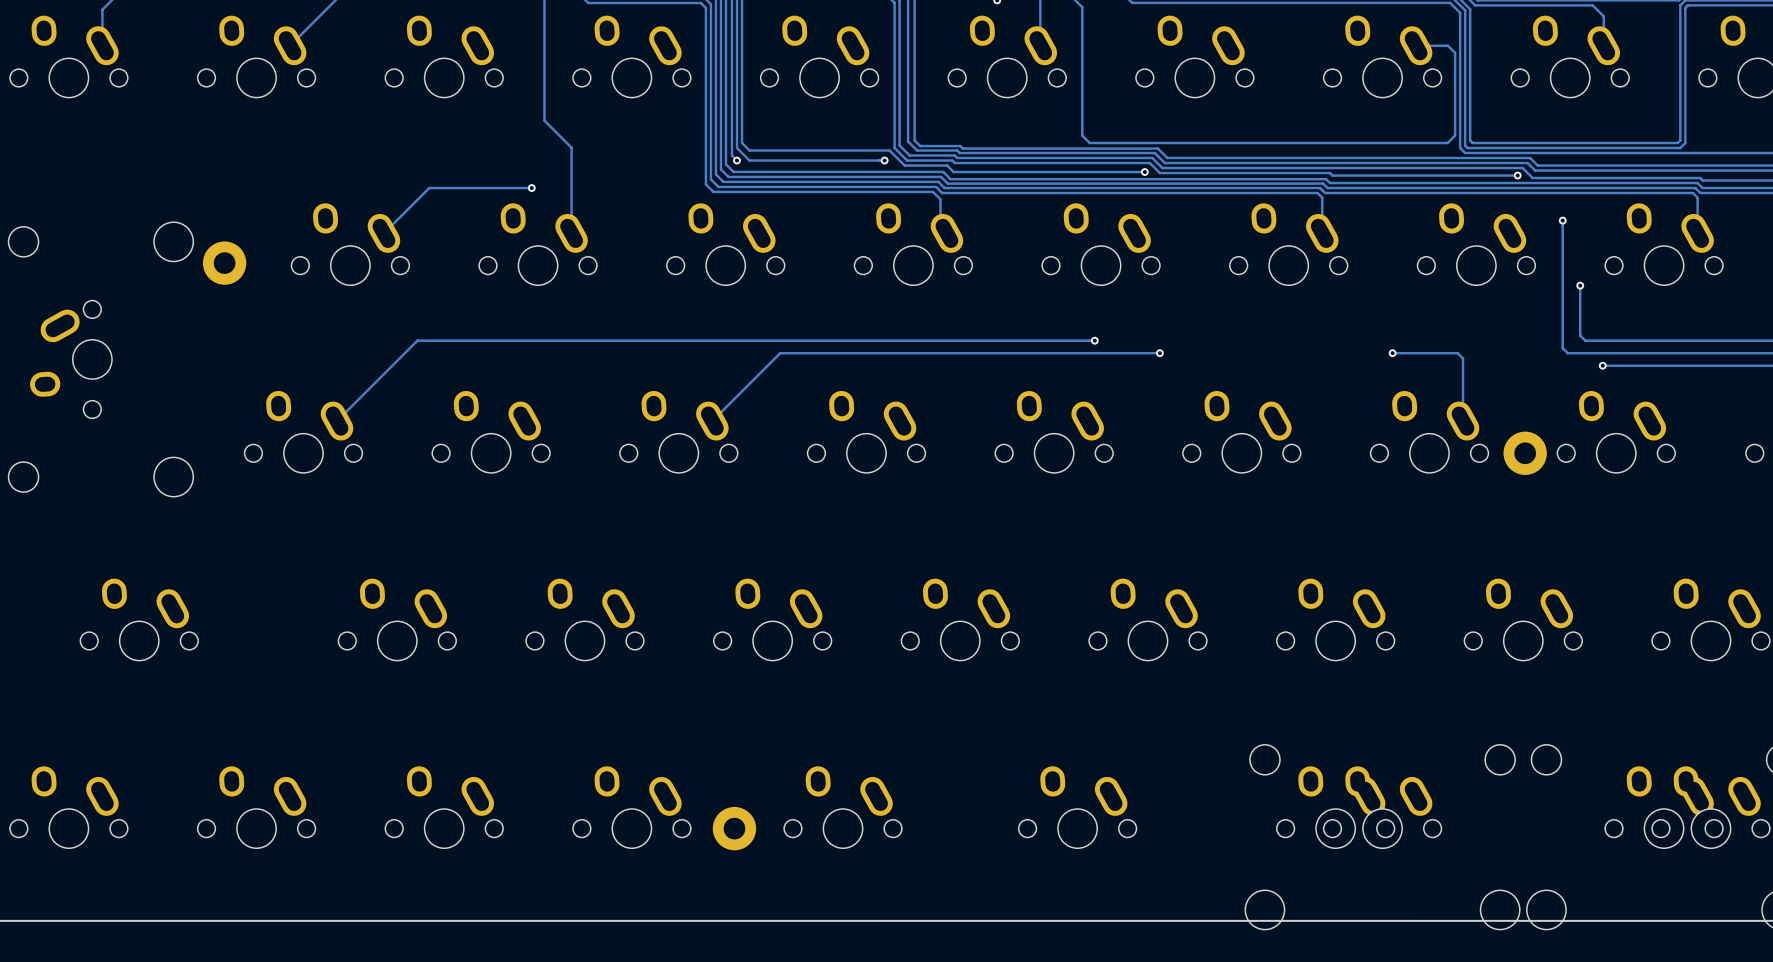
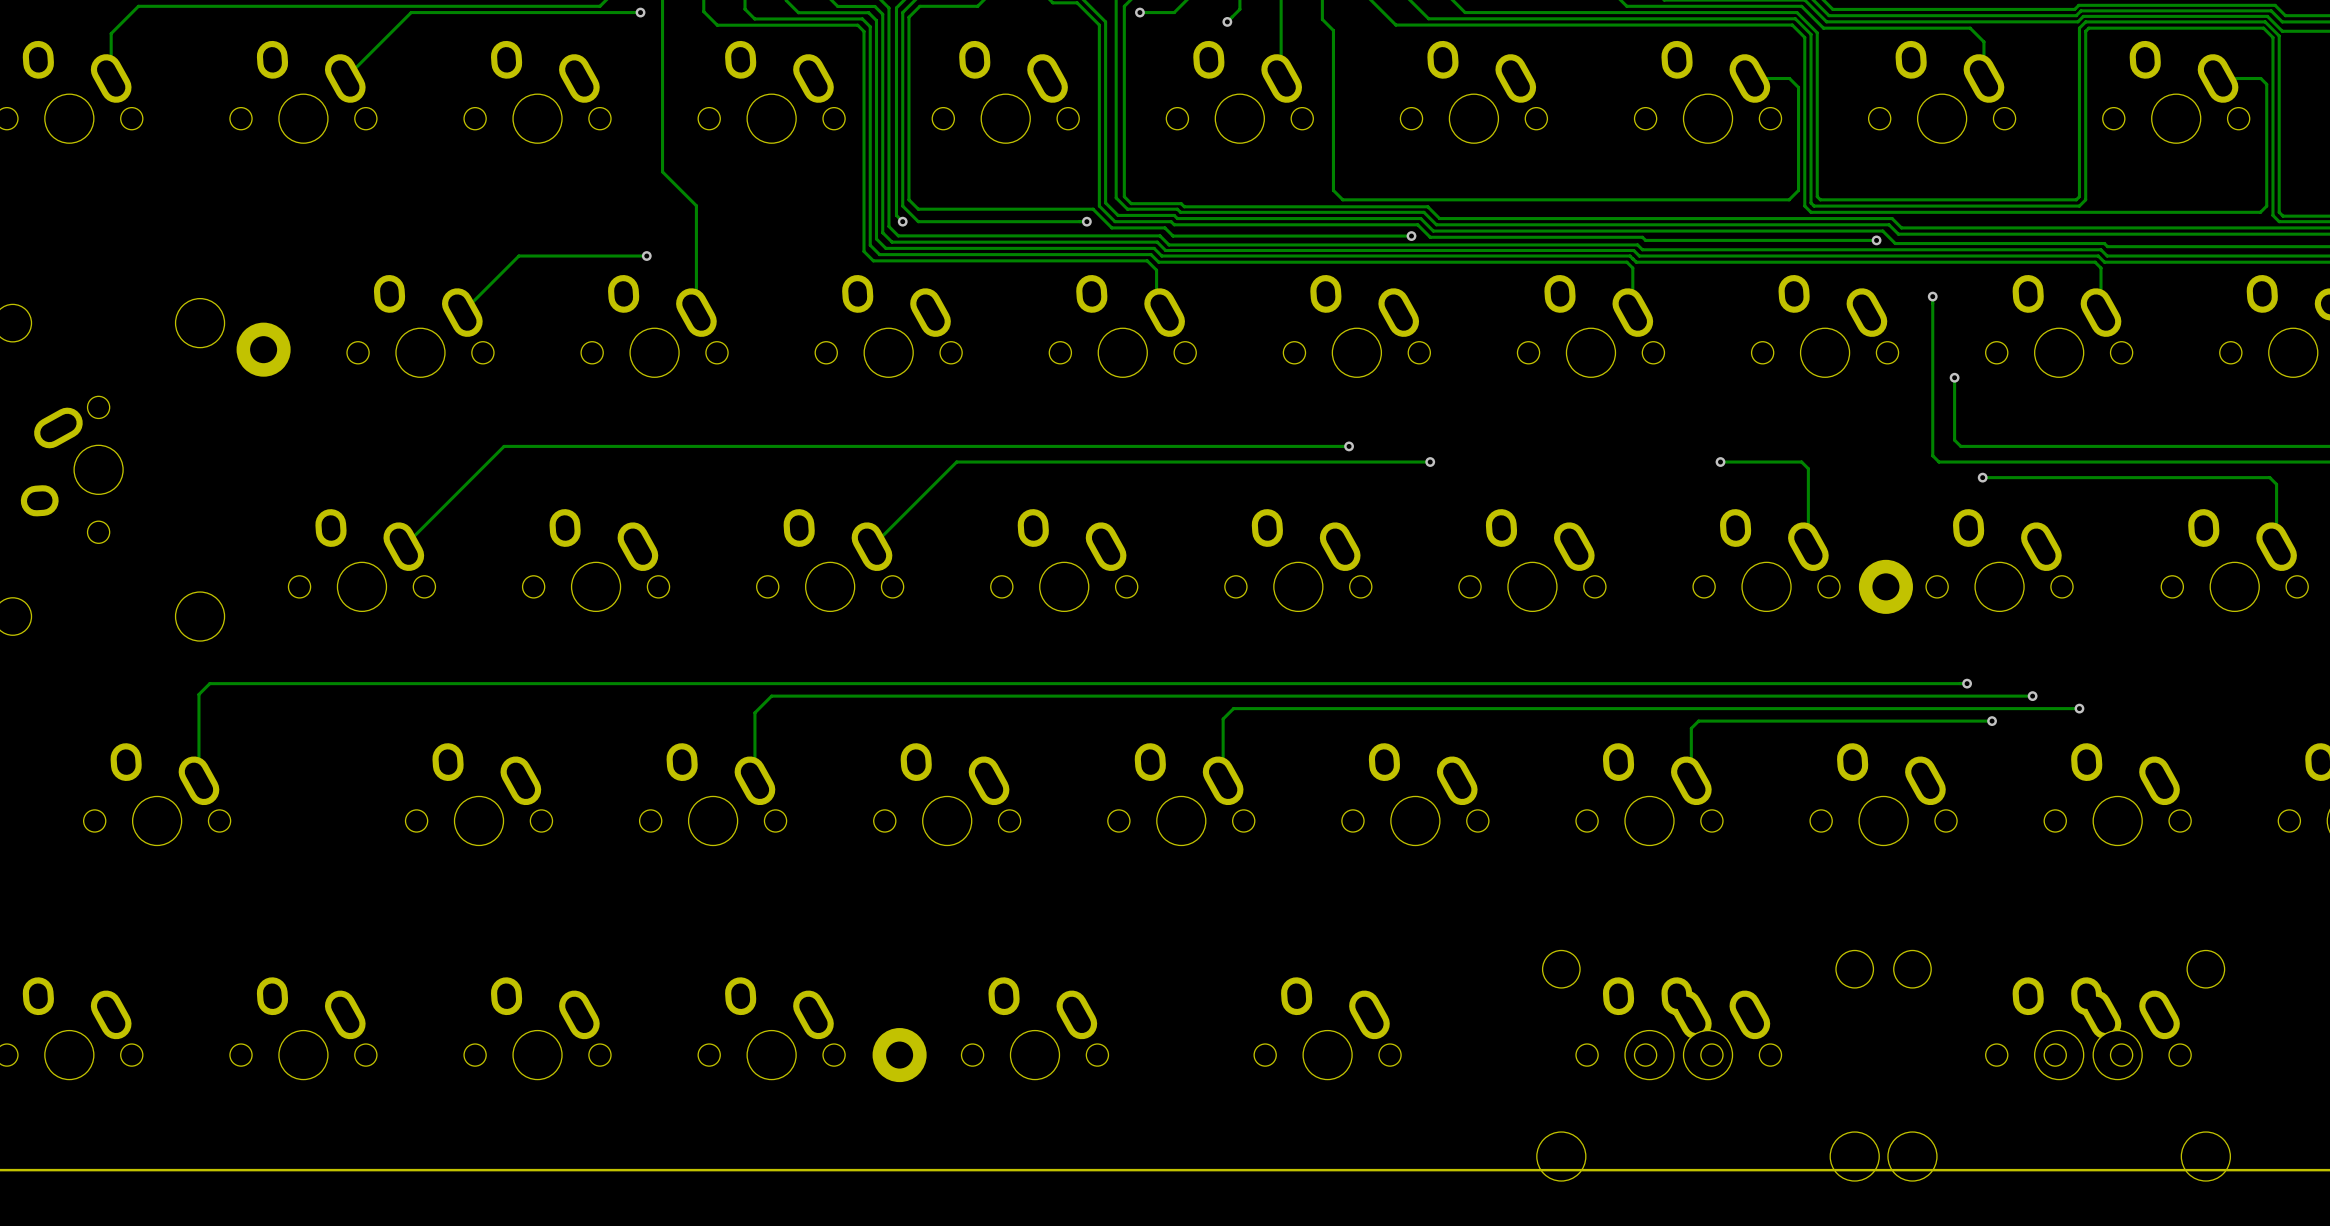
track: none -> (1967, 683) (209, 683) (198, 694) (198, 780)
via: none -> (1967, 683)
track: none -> (2032, 696) (771, 696) (754, 712) (754, 780)
via: none -> (2032, 696)
track: none -> (2079, 708) (1233, 708) (1223, 719) (1223, 780)
via: none -> (2079, 708)
track: none -> (1992, 721) (1698, 721) (1691, 728) (1691, 780)
via: none -> (1992, 721)

